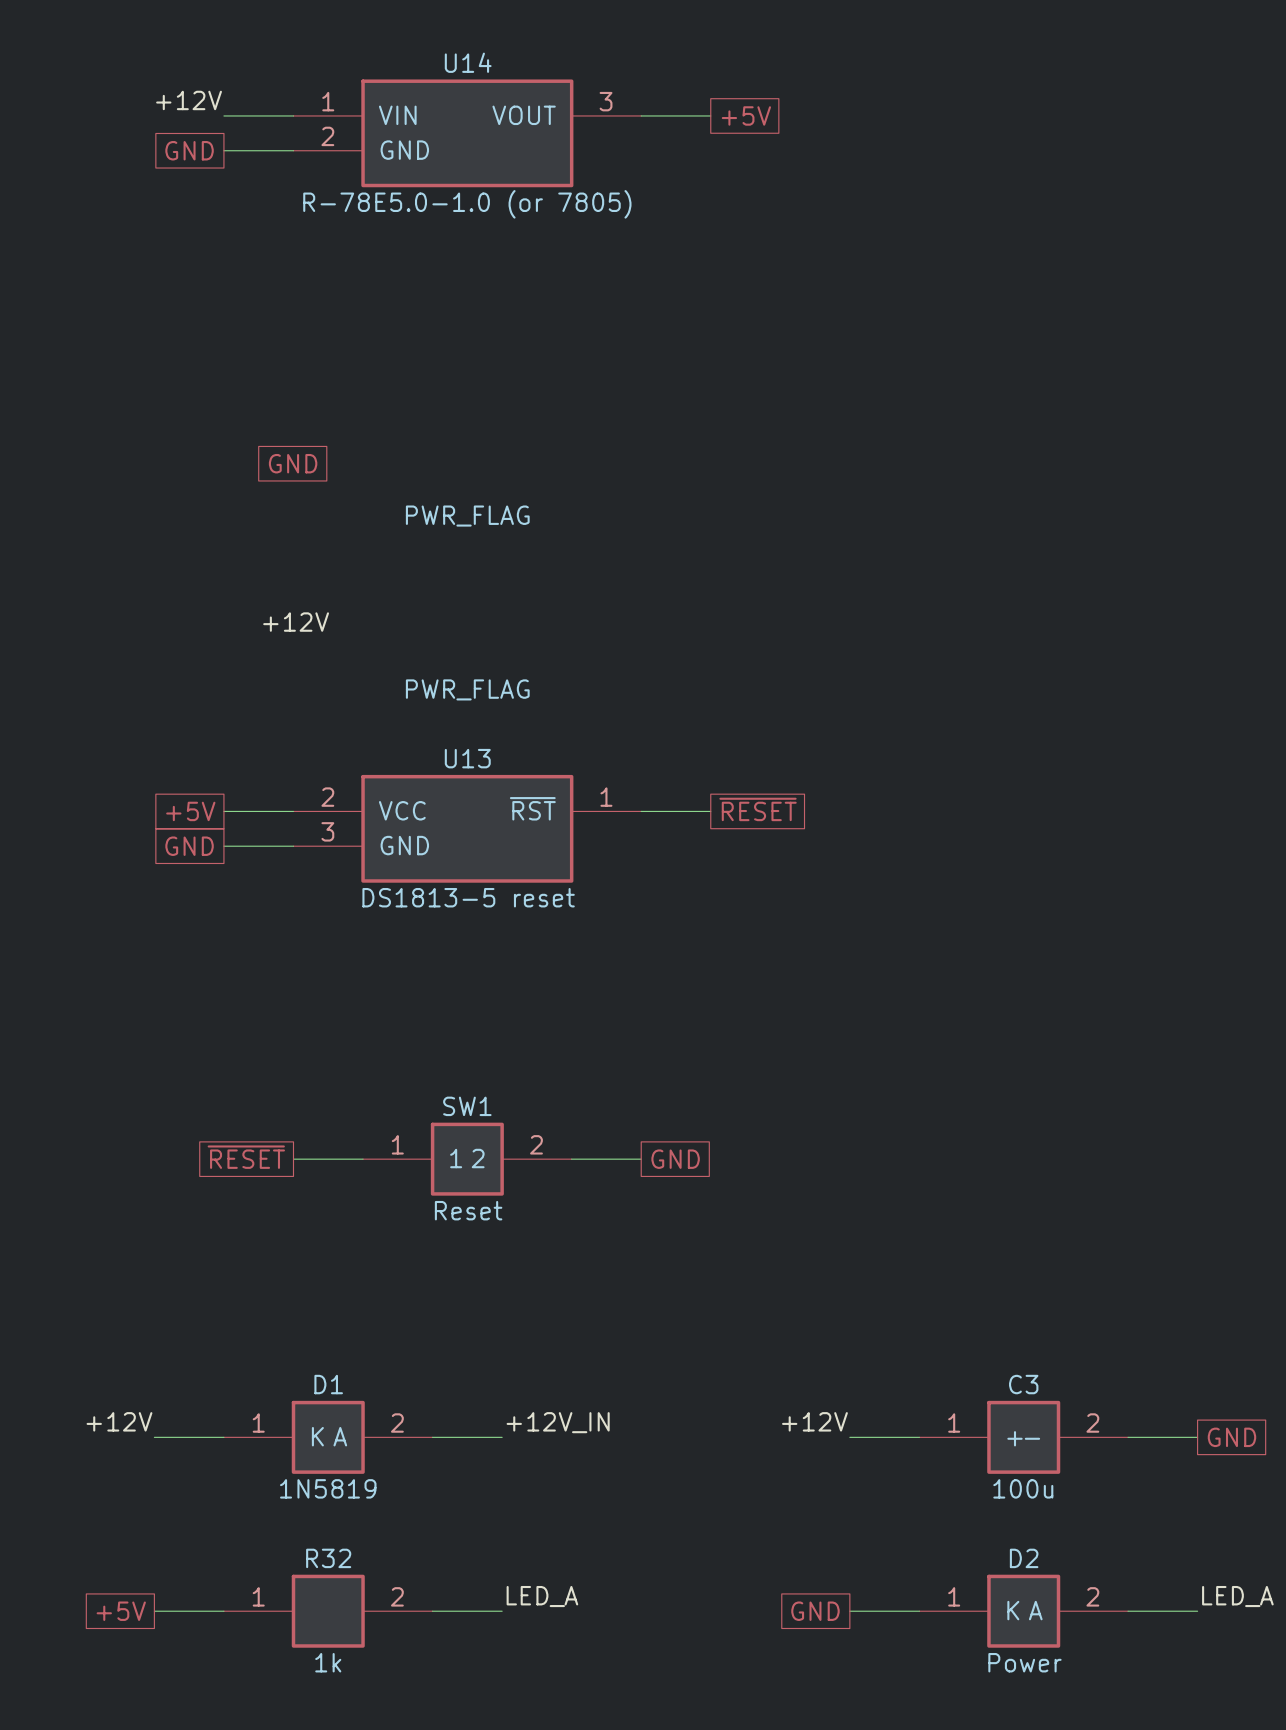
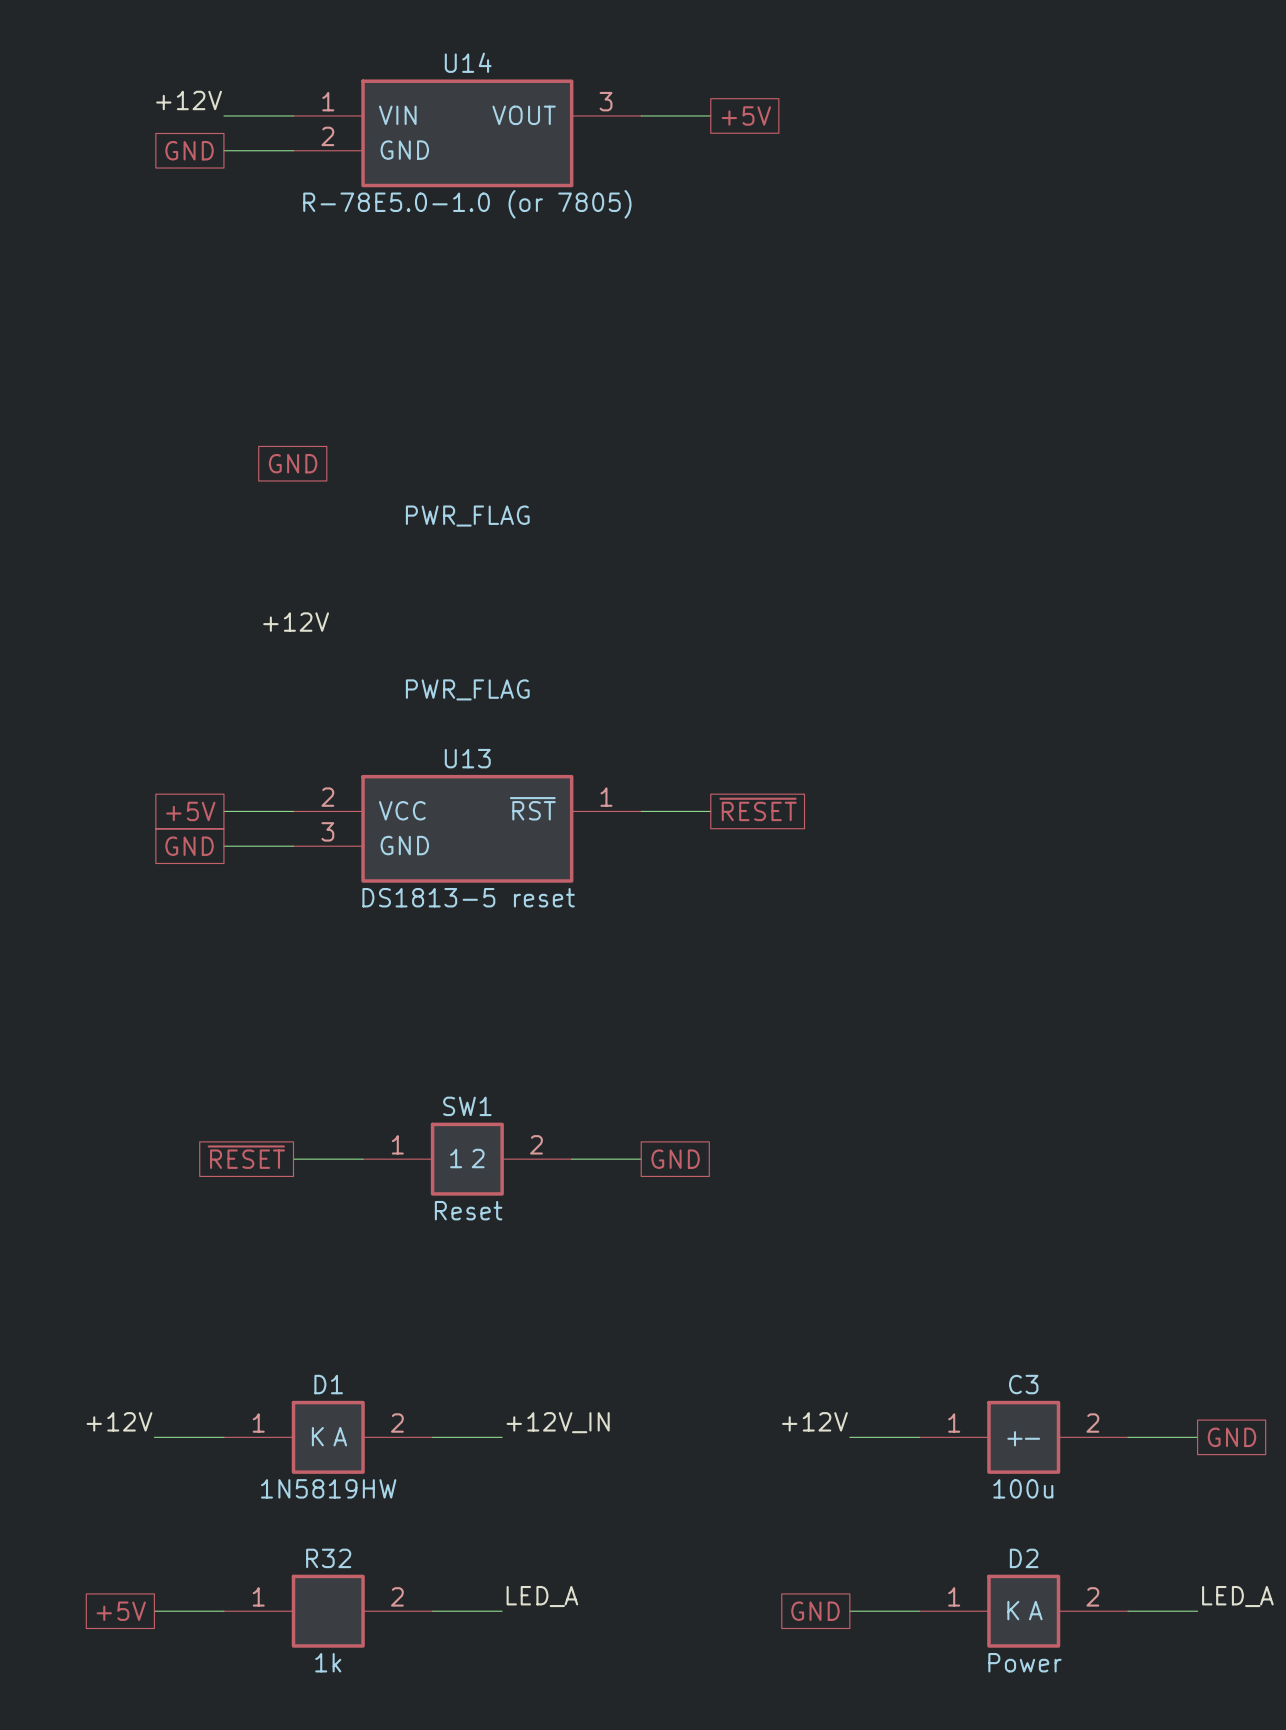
D1 value: 1N5819 (328, 1488) -> 1N5819HW (328, 1488)

